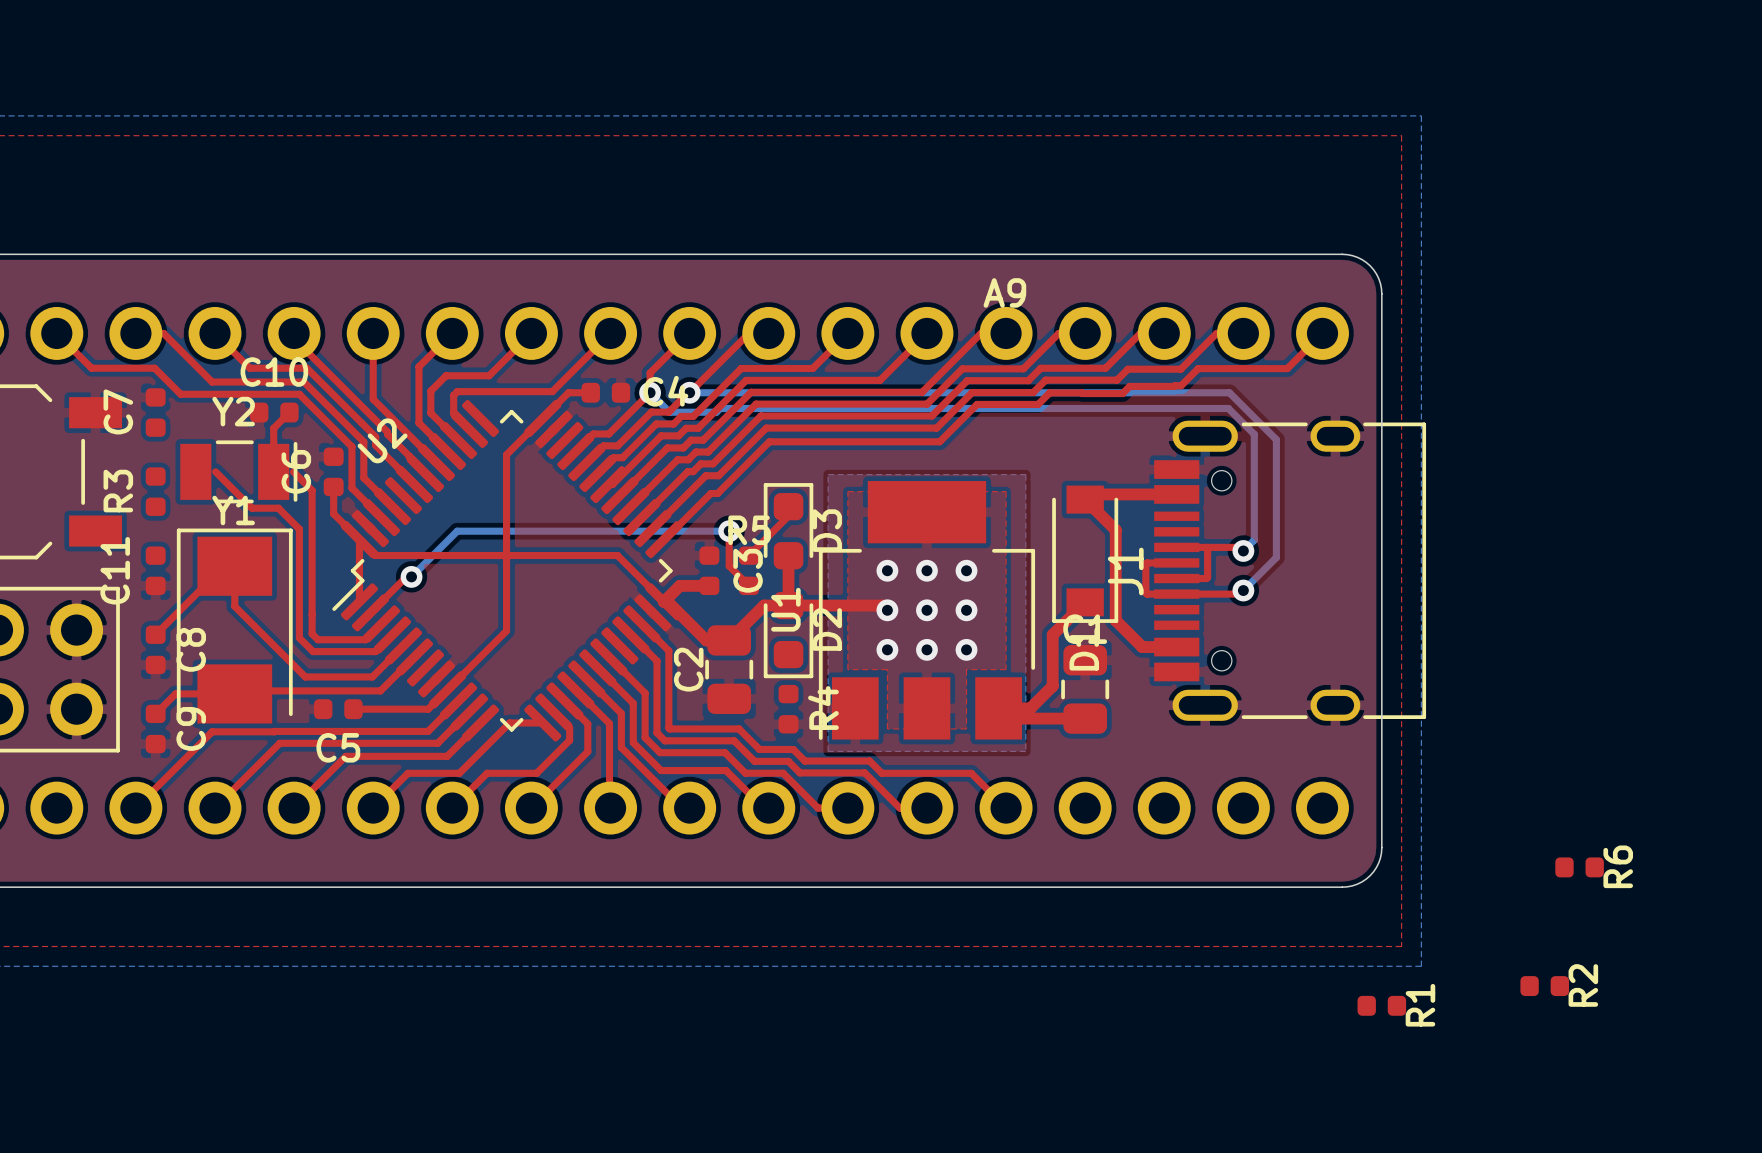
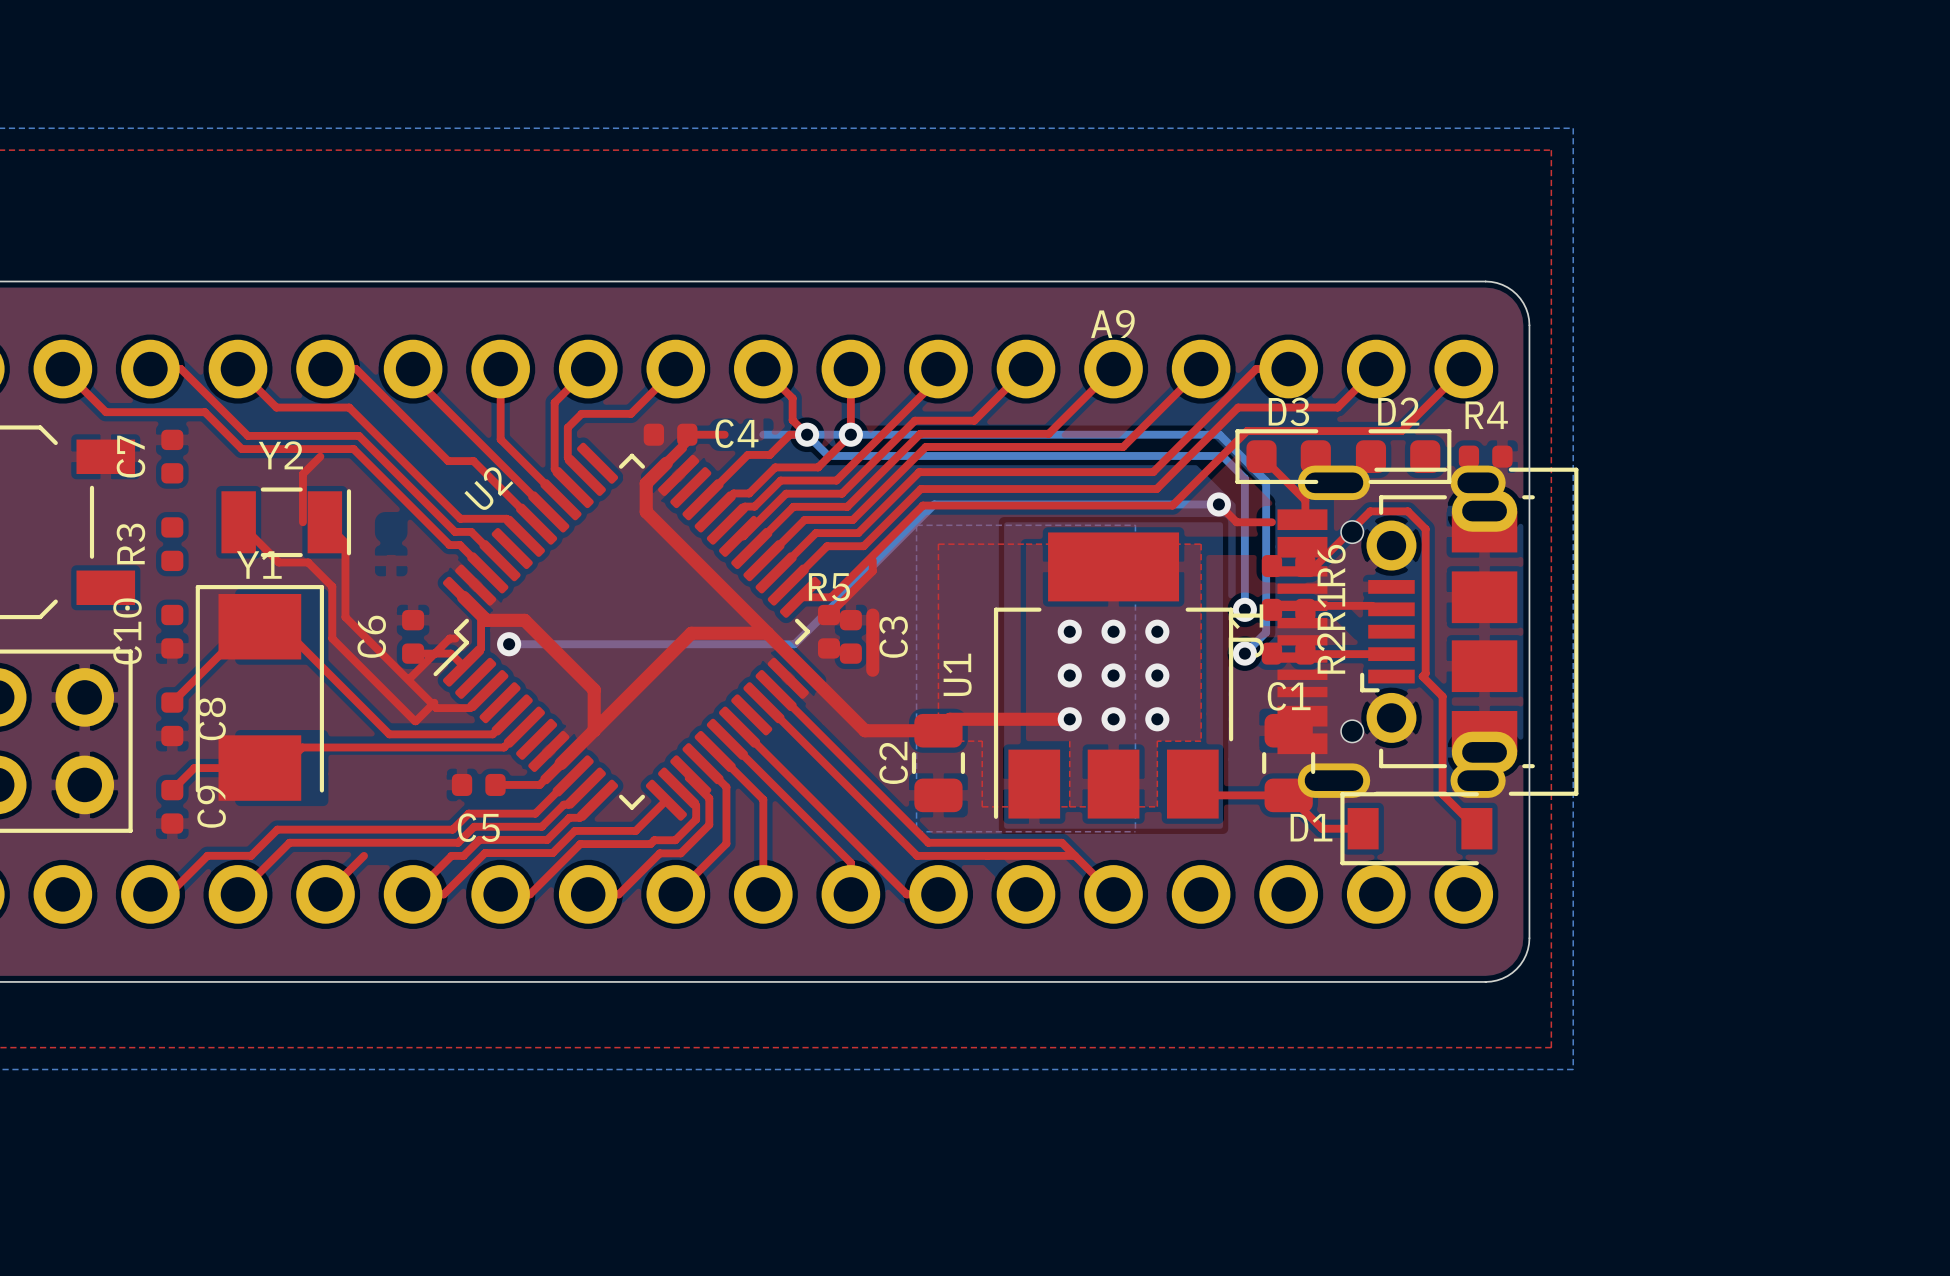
top track: (294, 333) (294, 338) (387, 432) (387, 434) (425, 473) -> (325, 369) (356, 369) (448, 461) (473, 461) (536, 524)
top track: (452, 333) (418, 366) (418, 423) (447, 451) -> (500, 369) (500, 439) (560, 499)
top track: (689, 333) (650, 372) (650, 392) (608, 433) (593, 433) (575, 451) -> (763, 369) (792, 398) (792, 420) (807, 434) (790, 434) (769, 454) (747, 454) (702, 499)
top track: (768, 333) (748, 333) (668, 412) (651, 412) (617, 445) (603, 445) (586, 462) -> (850, 369) (850, 434) (818, 467) (775, 467) (749, 493) (733, 493) (715, 511)
top track: (847, 333) (812, 368) (741, 368) (693, 416) (681, 416) (673, 424) (656, 424) (622, 457) (613, 457) (597, 473) -> (938, 369) (938, 378) (836, 480) (780, 480) (754, 506) (744, 506) (727, 524)
top track: (1006, 333) (980, 333) (922, 392) (751, 392) (703, 440) (691, 440) (683, 447) (667, 447) (619, 495) -> (1113, 369) (1048, 433) (920, 433) (847, 506) (793, 506) (751, 548)
top track: (1085, 333) (1058, 333) (1023, 368) (962, 368) (927, 404) (756, 404) (708, 452) (696, 452) (688, 459) (677, 459) (630, 506) -> (1201, 369) (1123, 446) (925, 446) (852, 519) (804, 519) (763, 560)
top track: (1140, 333) (1105, 368) (1040, 368) (1028, 380) (967, 380) (932, 415) (760, 415) (713, 463) (700, 463) (693, 471) (687, 471) (641, 517) -> (1262, 369) (1256, 369) (1153, 472) (919, 472) (858, 533) (815, 533) (776, 572)
top track: (1243, 333) (1216, 333) (1180, 369) (1127, 369) (1117, 380) (1045, 380) (1033, 392) (972, 392) (936, 428) (766, 428) (718, 475) (705, 475) (652, 528) -> none
top track: (373, 339) (373, 399) (436, 462) -> (413, 376) (548, 511)
top track: (501, 363) (489, 375) (446, 375) (430, 391) (430, 413) (458, 440) -> (554, 402) (554, 469) (573, 487)
top track: (91, 368) (154, 368) (180, 394) (299, 394) (351, 446) (351, 488) (381, 517) -> (101, 407) (105, 412) (204, 412) (241, 449) (353, 449) (449, 545) (460, 545) (487, 572)
top track: (306, 368) (375, 436) (375, 445) (414, 484) -> (339, 407) (349, 407) (460, 518) (506, 518) (524, 536)
top track: (1287, 368) (1198, 368) (1181, 385) (1129, 386) (1126, 389) -> (1424, 408) (1401, 431) (1247, 431)
top track: (570, 373) (552, 391) (457, 391) (453, 395) (453, 413) (469, 429) -> (630, 413) (581, 413) (567, 427) (567, 457) (585, 475)
top track: (880, 380) (746, 380) (698, 428) (686, 428) (678, 435) (661, 435) (612, 484) (608, 484) -> (974, 420) (914, 420) (841, 493) (786, 493) (743, 536) (739, 536)
top track: (212, 382) (303, 382) (363, 441) (363, 477) (392, 506) -> (234, 422) (247, 435) (359, 435) (455, 531) (471, 531) (500, 560)
top track: (590, 392) (568, 392) (506, 454) (506, 630) (428, 709) (353, 709) -> none
bottom track: (650, 392) (669, 412) (716, 412) (720, 408) (1228, 408) (1254, 434) (1254, 540) (1243, 550) -> none
via: (650, 392) -> none
top track: none -> (724, 434) (694, 434) (646, 483) (646, 511) (865, 730) (938, 730) (949, 719) (1069, 719)
via: (689, 392) -> none
bottom track: none -> (807, 434) (828, 455) (1222, 455) (1244, 478) (1244, 609)
via: none -> (807, 434)
via: none -> (850, 434)
bottom track: (1101, 392) (1229, 392) (1276, 439) (1276, 557) (1243, 590) -> (1219, 434) (1266, 481) (1266, 632) (1244, 653)
top track: (1122, 393) (1049, 392) (1038, 404) (977, 404) (939, 441) -> (1376, 369) (1337, 407) (1238, 407) (1156, 489) (1040, 489)
top track: none -> (1242, 435) (1172, 505) (922, 505) (831, 597) (800, 597)
C10: (274, 412) -> none
top track: none -> (1261, 456) (1305, 500) (1305, 522)
top track: (832, 441) (769, 441) (717, 493) (710, 493) (663, 539) -> (920, 489) (863, 546) (827, 546) (788, 585)
top track: none -> (1218, 504) (1236, 522) (1271, 522)
bottom track: none -> (1218, 504) (934, 504) (794, 644) (509, 644)
via: none -> (1218, 504)
Y2 position: (238, 471) -> (286, 522)
C6 position: (333, 471) -> (413, 636)
top track: (333, 486) (333, 513) (375, 555) (617, 555) (663, 601) -> none
top zone outline: (1006, 491) (1006, 669) (966, 669) -> (1113, 544) (1201, 544) (1201, 741) (1157, 741) (1157, 806) (1069, 806)
top track: (1176, 494) (1090, 494) (1085, 499) (1115, 530) (1115, 620) (1142, 647) (1176, 647) -> none
top track: none -> (1305, 566) (1315, 566) (1370, 511) (1407, 511) (1425, 529) (1425, 673) (1422, 676) (1442, 696) (1442, 794) (1476, 828)
D3 rotation: 0° (788, 526) -> 90° counterclockwise (1283, 456)
D3 position: (788, 526) -> (1283, 456)
top track: (299, 529) (299, 637) (313, 651) (374, 651) -> (331, 585) (332, 638) (415, 721)
top track: (729, 531) (729, 566) (748, 585) -> none
bottom track: (729, 531) (457, 531) (411, 576) -> none
via: (729, 531) -> none
top track: (359, 539) (359, 601) -> none
top track: (1206, 547) (1207, 577) (1176, 578) -> none
via: none -> (1244, 609)
via: (1243, 550) -> none
D1 rotation: 0° (1085, 554) -> 90° clockwise (1416, 828)
D1 position: (1085, 554) -> (1416, 828)
top track: (312, 557) (312, 633) (317, 639) (365, 639) (381, 623) -> (345, 617) (436, 708) (470, 708) (487, 690)
top track: (1176, 562) (1145, 564) (1147, 594) (1239, 594) (1243, 590) -> none
top track: none -> (248, 626) (281, 626) (389, 734) (492, 734) (512, 714)
top track: (234, 566) (234, 606) (305, 676) (372, 676) (403, 645) -> none
C11 name: C11 (115, 570) -> C10 (127, 631)
U2 position: (507, 570) -> (627, 631)
C3 position: (709, 570) -> (850, 636)
via: (887, 570) -> none
via: (926, 570) -> none
via: none -> (1113, 631)
via: none -> (1157, 631)
part: none -> (1447, 631)
top track: none -> (767, 633) (691, 633) (539, 784) (495, 784)
via position: (411, 576) -> (509, 644)
top track: (709, 585) (679, 585) (663, 601) -> none
top track: none -> (413, 653) (450, 653) (463, 666) (481, 648) (481, 614) (463, 597) (486, 620) (524, 620) (594, 689) (594, 730)
via: none -> (1244, 653)
top track: none -> (1305, 653) (1391, 654)
via: (1243, 590) -> none
top track: (663, 601) (667, 601) (706, 640) (729, 640) (764, 605) (882, 605) (887, 610) -> none
top track: (1085, 602) (1052, 634) (1052, 686) (1030, 708) (998, 708) (1008, 718) (1085, 718) -> none
via: (887, 610) -> none
U1 position: (926, 610) -> (1113, 675)
via: (926, 610) -> none
via: none -> (1113, 675)
via: none -> (1157, 675)
top track: (641, 623) (668, 650) (669, 728) (739, 728) (759, 749) (793, 749) (804, 761) (869, 761) (881, 773) -> (763, 702) (917, 855) (976, 855)
top track: none -> (776, 690) (928, 842) (1061, 842) (1075, 855)
top track: (630, 634) (656, 661) (656, 732) (664, 740) (734, 740) (754, 761) (788, 761) (799, 772) (864, 772) (899, 808) (926, 808) -> none
D2 rotation: 0° (788, 635) -> 90° counterclockwise (1403, 456)
D2 position: (788, 635) -> (1403, 456)
via: (887, 649) -> none
via: (926, 649) -> none
via: none -> (1113, 719)
via: none -> (1157, 719)
top track: (414, 656) (380, 690) (237, 690) (234, 693) -> (524, 727) (504, 747) (302, 747) (281, 768) (259, 768)
top track: (608, 656) (645, 693) (645, 737) (660, 752) (724, 752) (745, 773) (783, 773) (819, 808) -> (739, 727) (906, 894)
top track: (597, 667) (633, 703) (633, 742) (661, 770) (726, 770) (763, 808) (768, 808) -> (727, 739) (850, 862) (850, 894)
C2 position: (729, 669) -> (938, 763)
top track: (586, 678) (621, 713) (621, 747) (681, 808) (689, 808) -> (715, 751) (763, 799) (763, 894)
top track: (575, 689) (609, 723) (610, 808) -> (702, 763) (726, 787) (726, 843) (675, 894)
C1 position: (1085, 689) -> (1288, 763)
top track: (458, 700) (428, 731) (274, 731) -> none
top track: (564, 700) (587, 723) (587, 751) (531, 808) -> (690, 775) (688, 777) (709, 798) (709, 824) (680, 853) (659, 853) (618, 894) (588, 894)
top track: none -> (1192, 784) (1204, 795) (1288, 795) (1322, 828) (1363, 828)
C5 position: (338, 709) -> (478, 784)
R4 rotation: 0° (788, 709) -> 90° clockwise (1485, 456)
R4 position: (788, 709) -> (1485, 456)
top track: (553, 711) (569, 727) (569, 740) (536, 773) (487, 773) (452, 808) -> (678, 788) (696, 805) (696, 819) (675, 840) (654, 840) (650, 844) (580, 844) (529, 894) (500, 894)
top track: (480, 722) (447, 756) (345, 756) (328, 773) -> none
top track: (542, 722) (509, 722) (459, 773) (418, 773) -> (597, 800) (579, 817) (569, 817) (547, 839) (479, 839) (463, 855)
top track: none -> (666, 800) (635, 830) (574, 830) (552, 853) (485, 853) (443, 894) (413, 894)
top track: (453, 727) (437, 743) (279, 743) (261, 761) -> (585, 788) (568, 804) (563, 804) (541, 826) (474, 826) (458, 842) (289, 842)
top track: (274, 731) (212, 731) (135, 808) -> (573, 775) (535, 813) (468, 813) (452, 829) (277, 829) (251, 855) (207, 855) (169, 894) (150, 894)
R6 position: (1579, 867) -> (1288, 566)
R2 position: (1544, 986) -> (1288, 653)
R1 position: (1381, 1005) -> (1288, 609)

